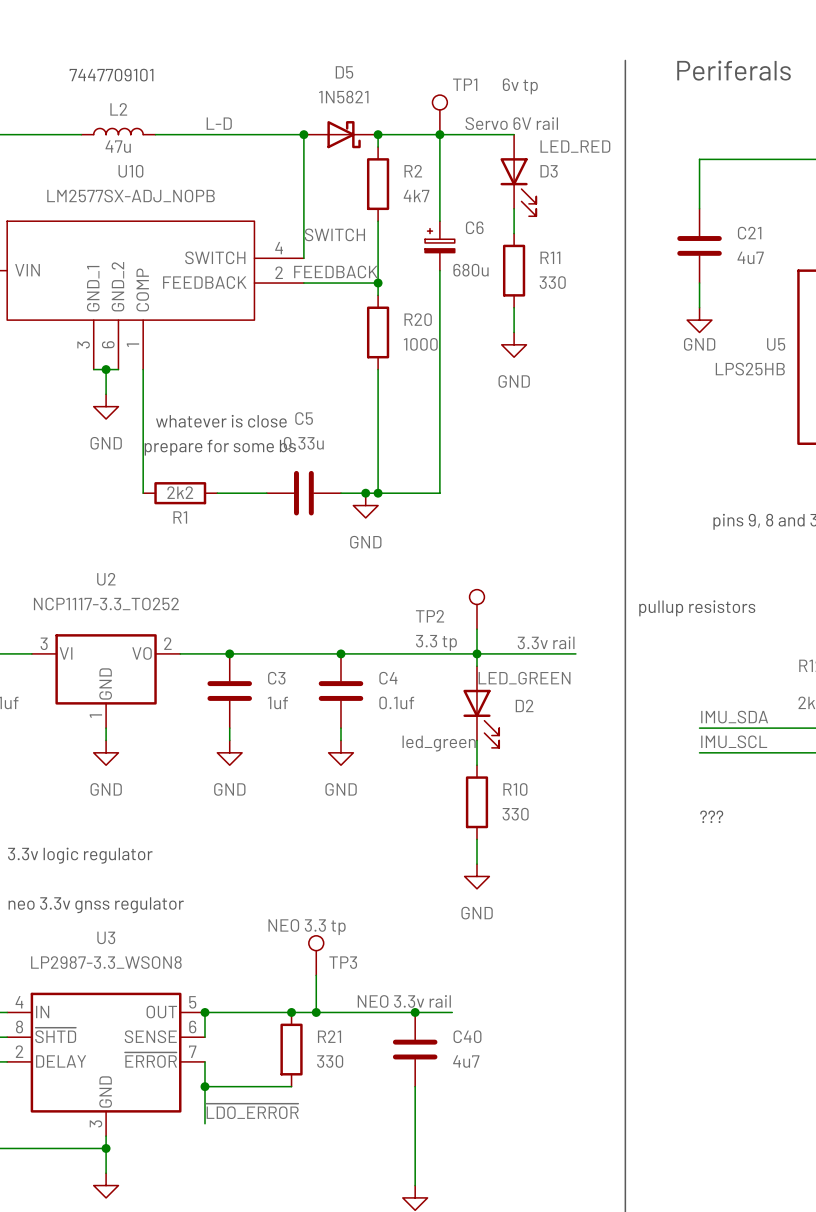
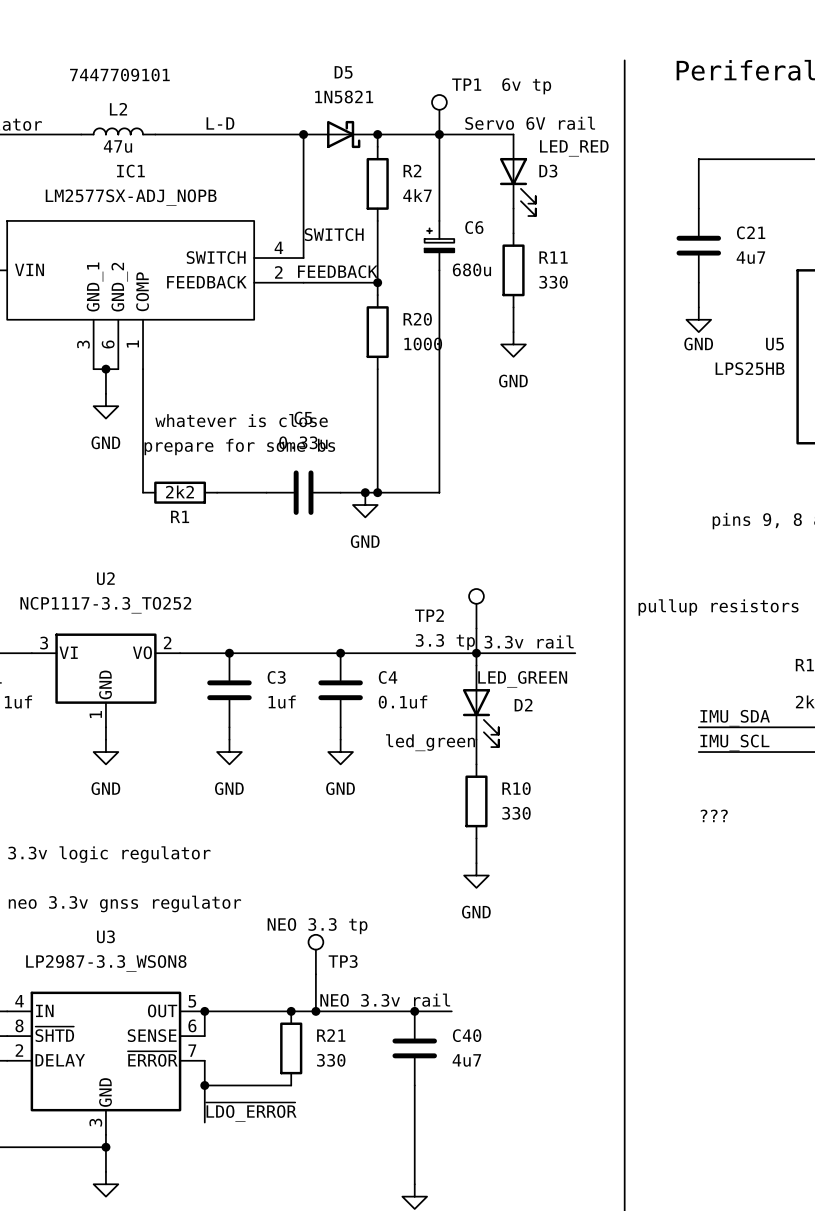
U10 name: U10 (130, 171) -> IC1 (130, 171)

